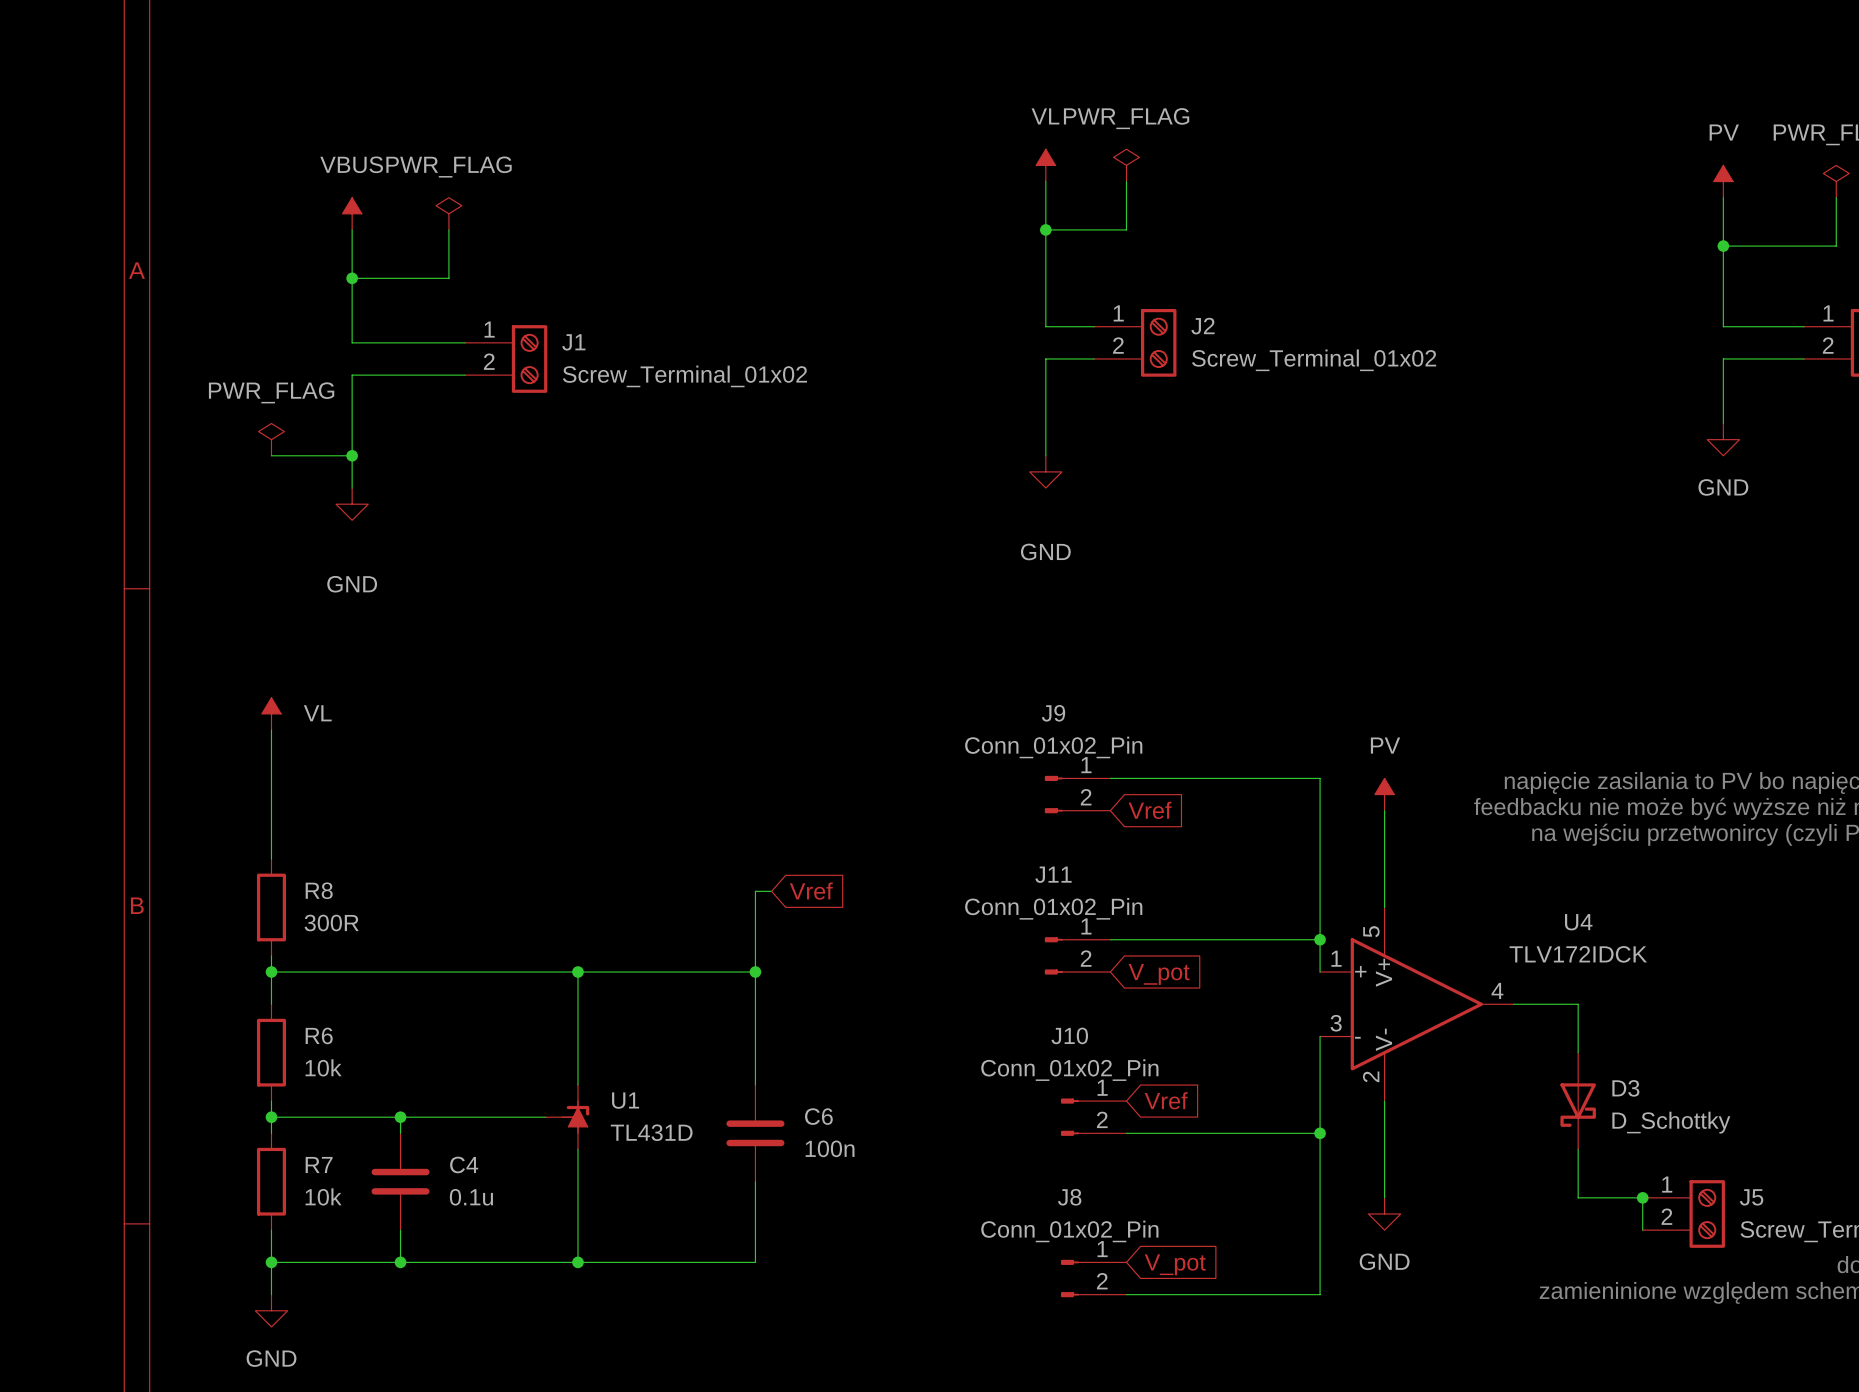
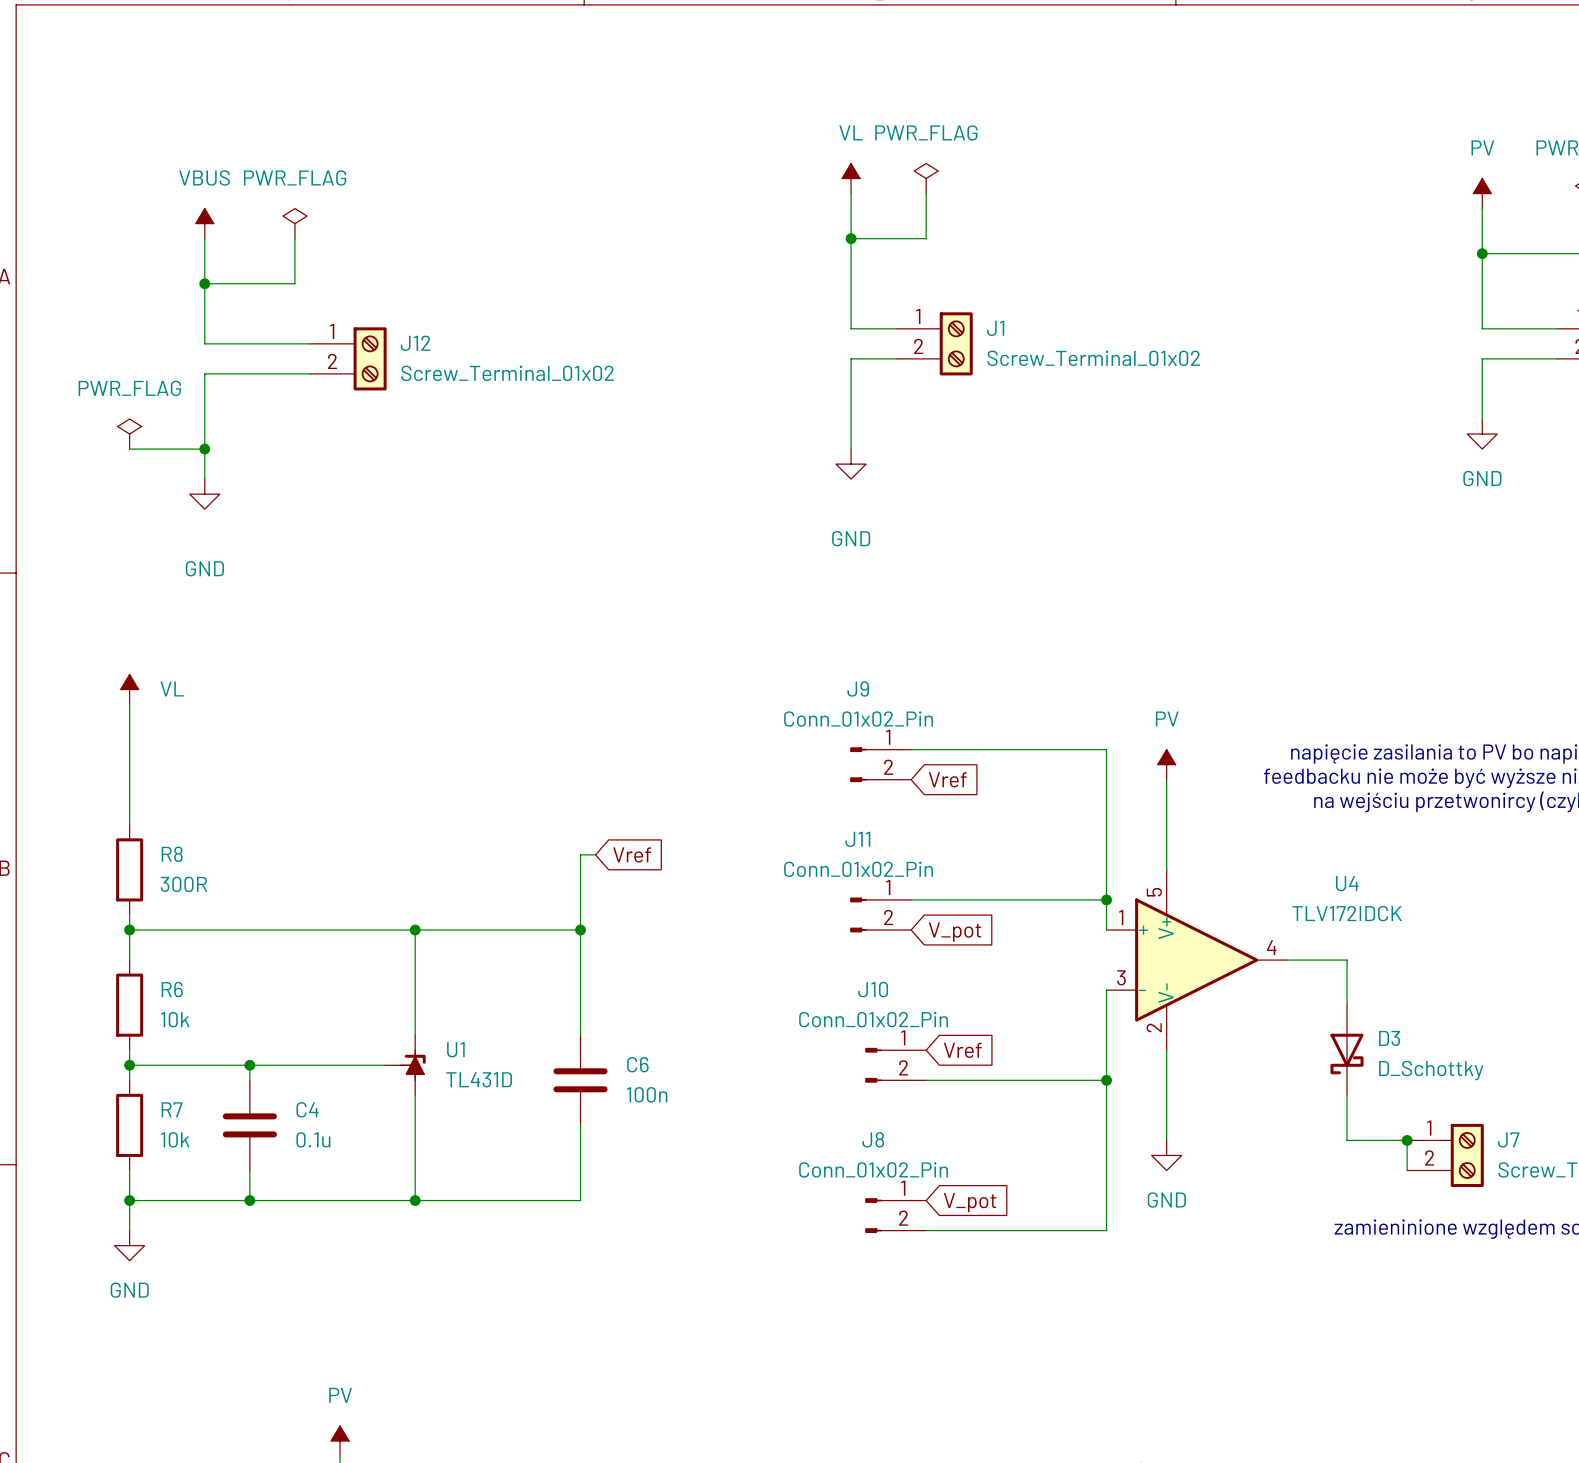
J2 name: J2 (1202, 326) -> J1 (995, 328)
J1 name: J1 (573, 342) -> J12 (415, 343)
J5 name: J5 (1751, 1197) -> J7 (1508, 1139)

